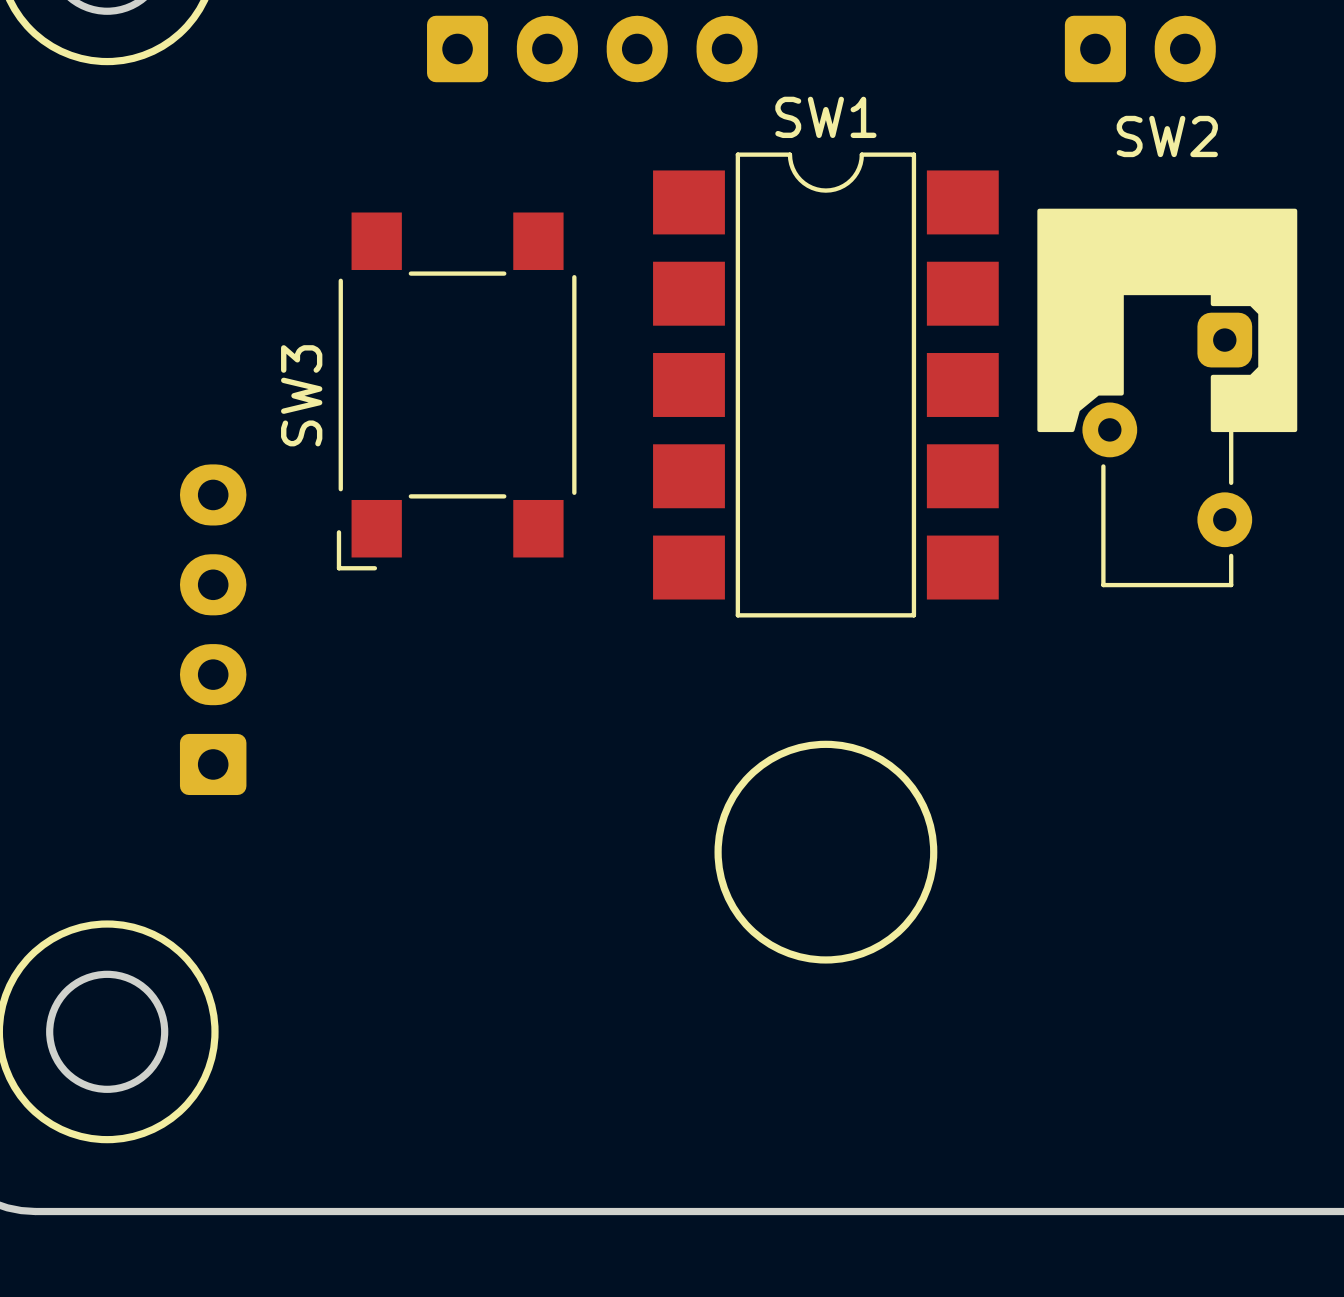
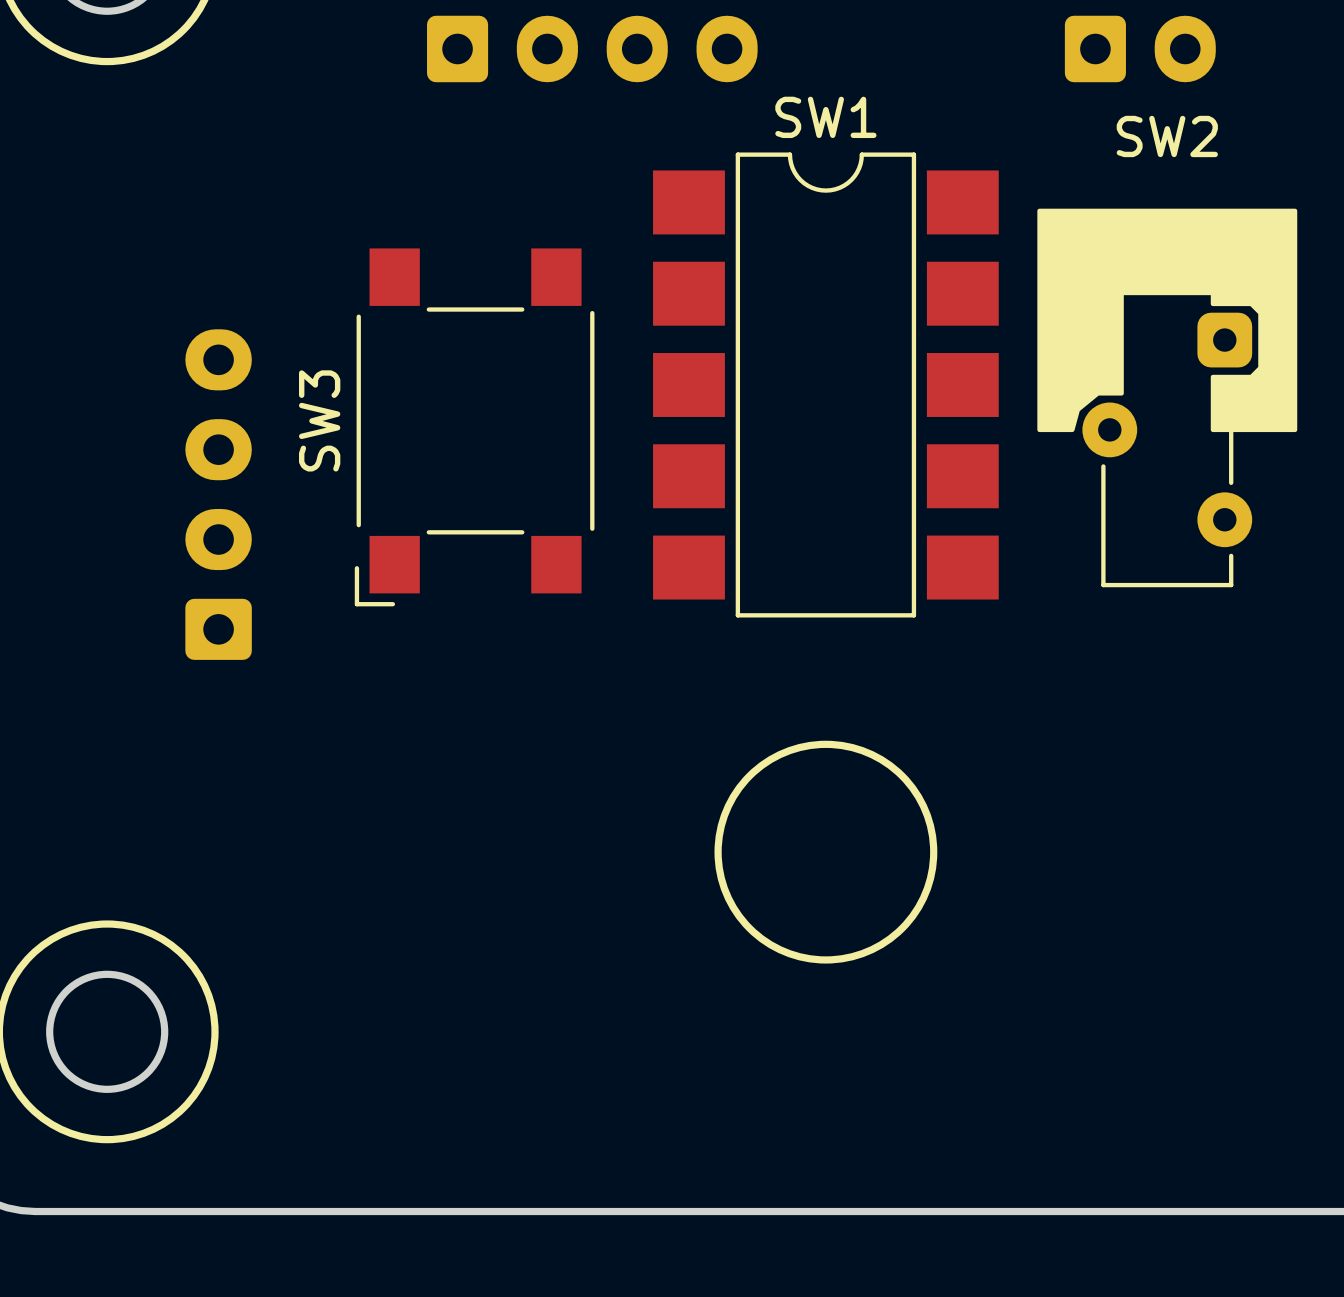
SW3 position: (456, 391) -> (474, 427)
SW3 name position: SW3 (301, 395) -> SW3 (319, 420)
part position: (213, 629) -> (218, 494)

